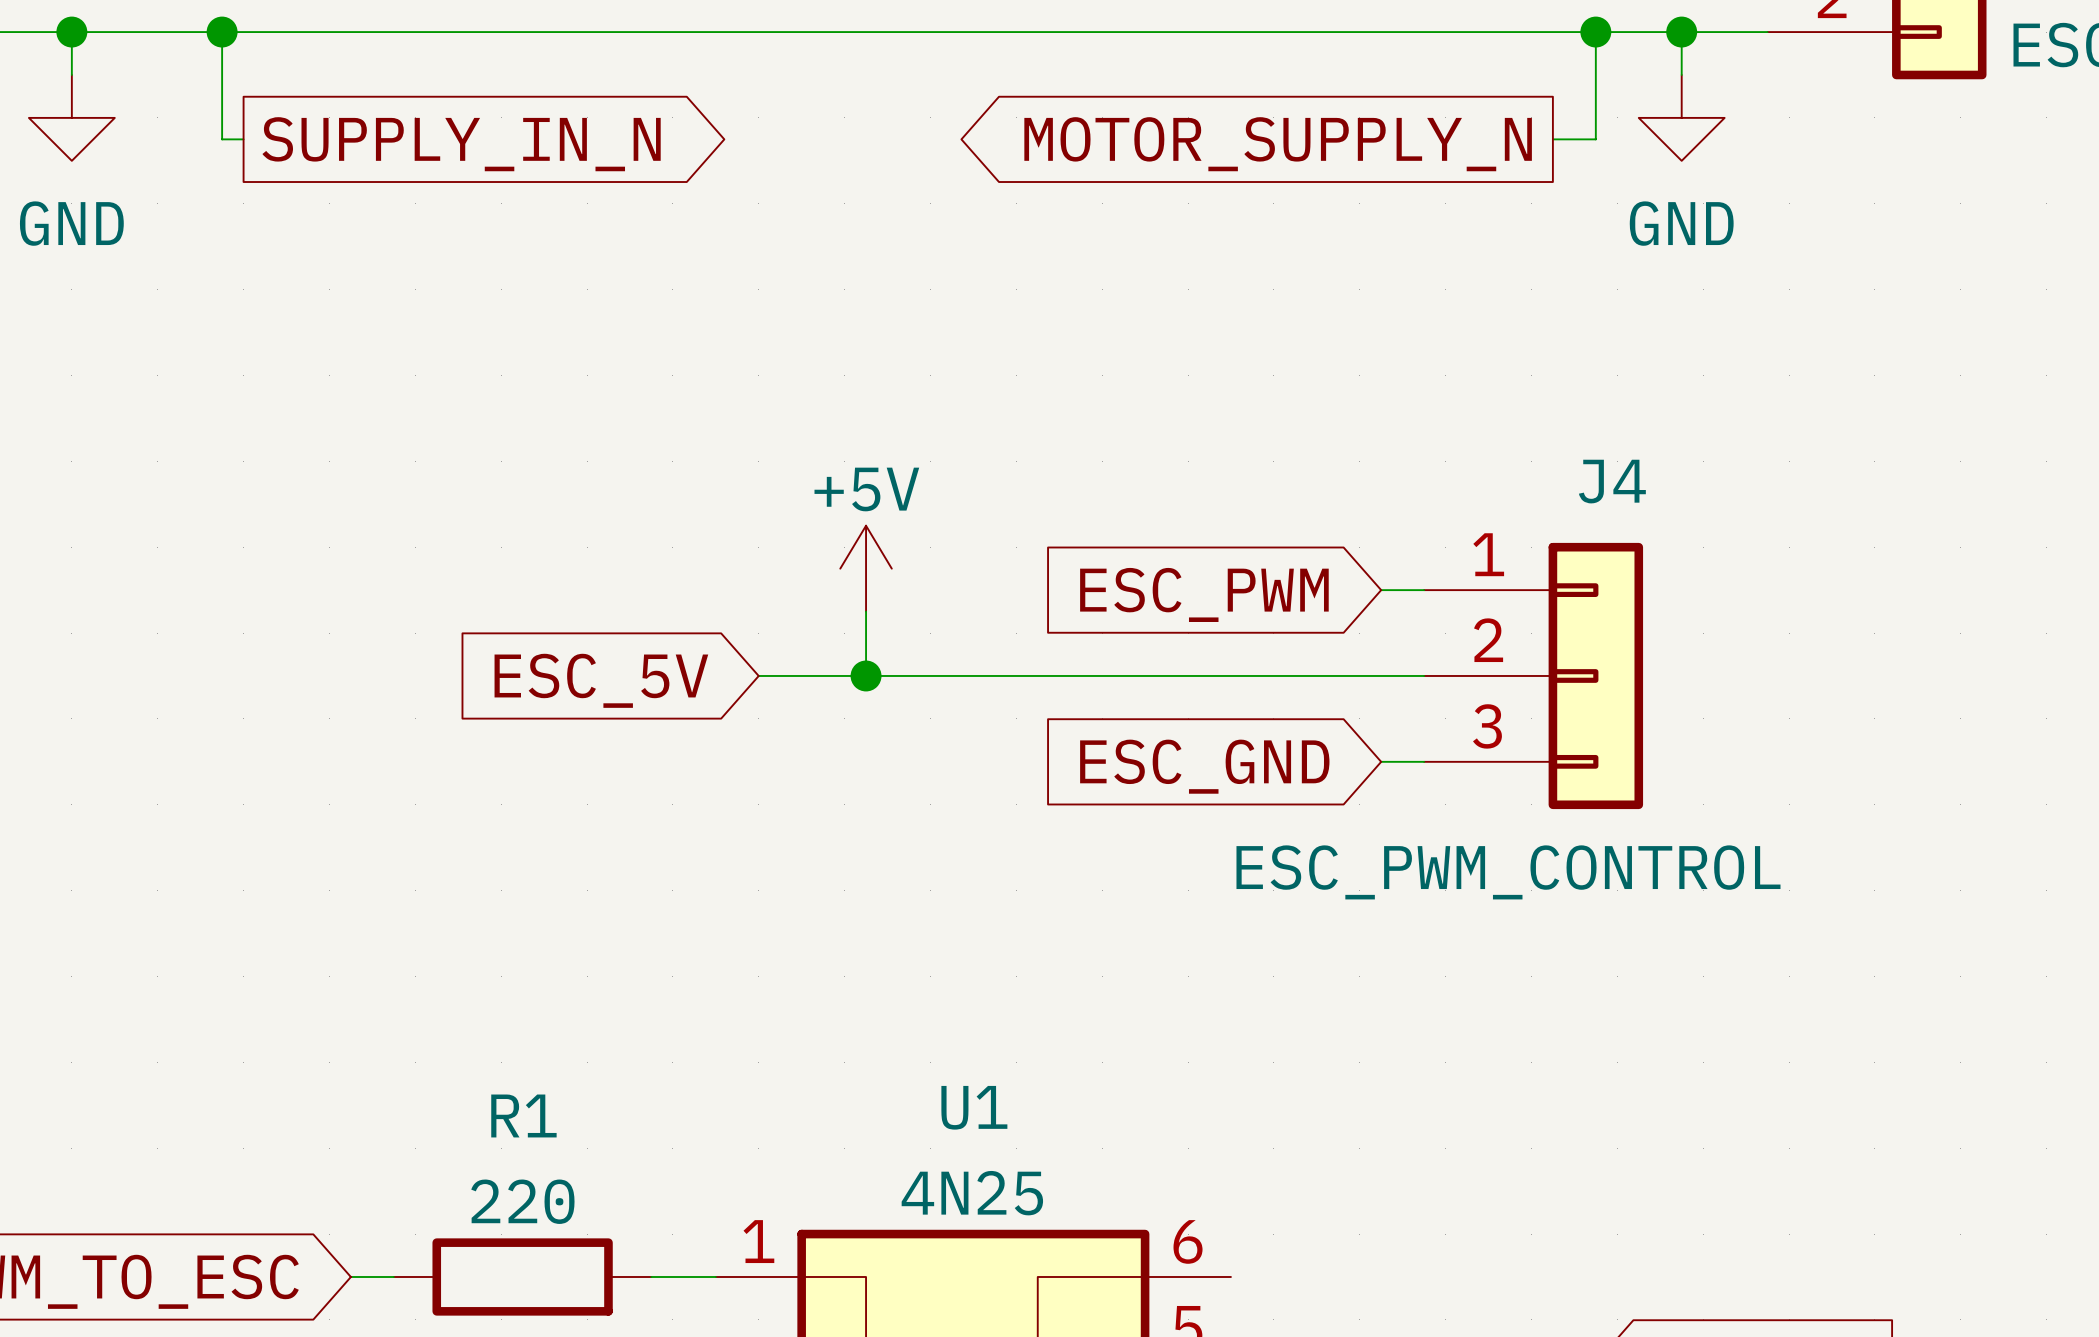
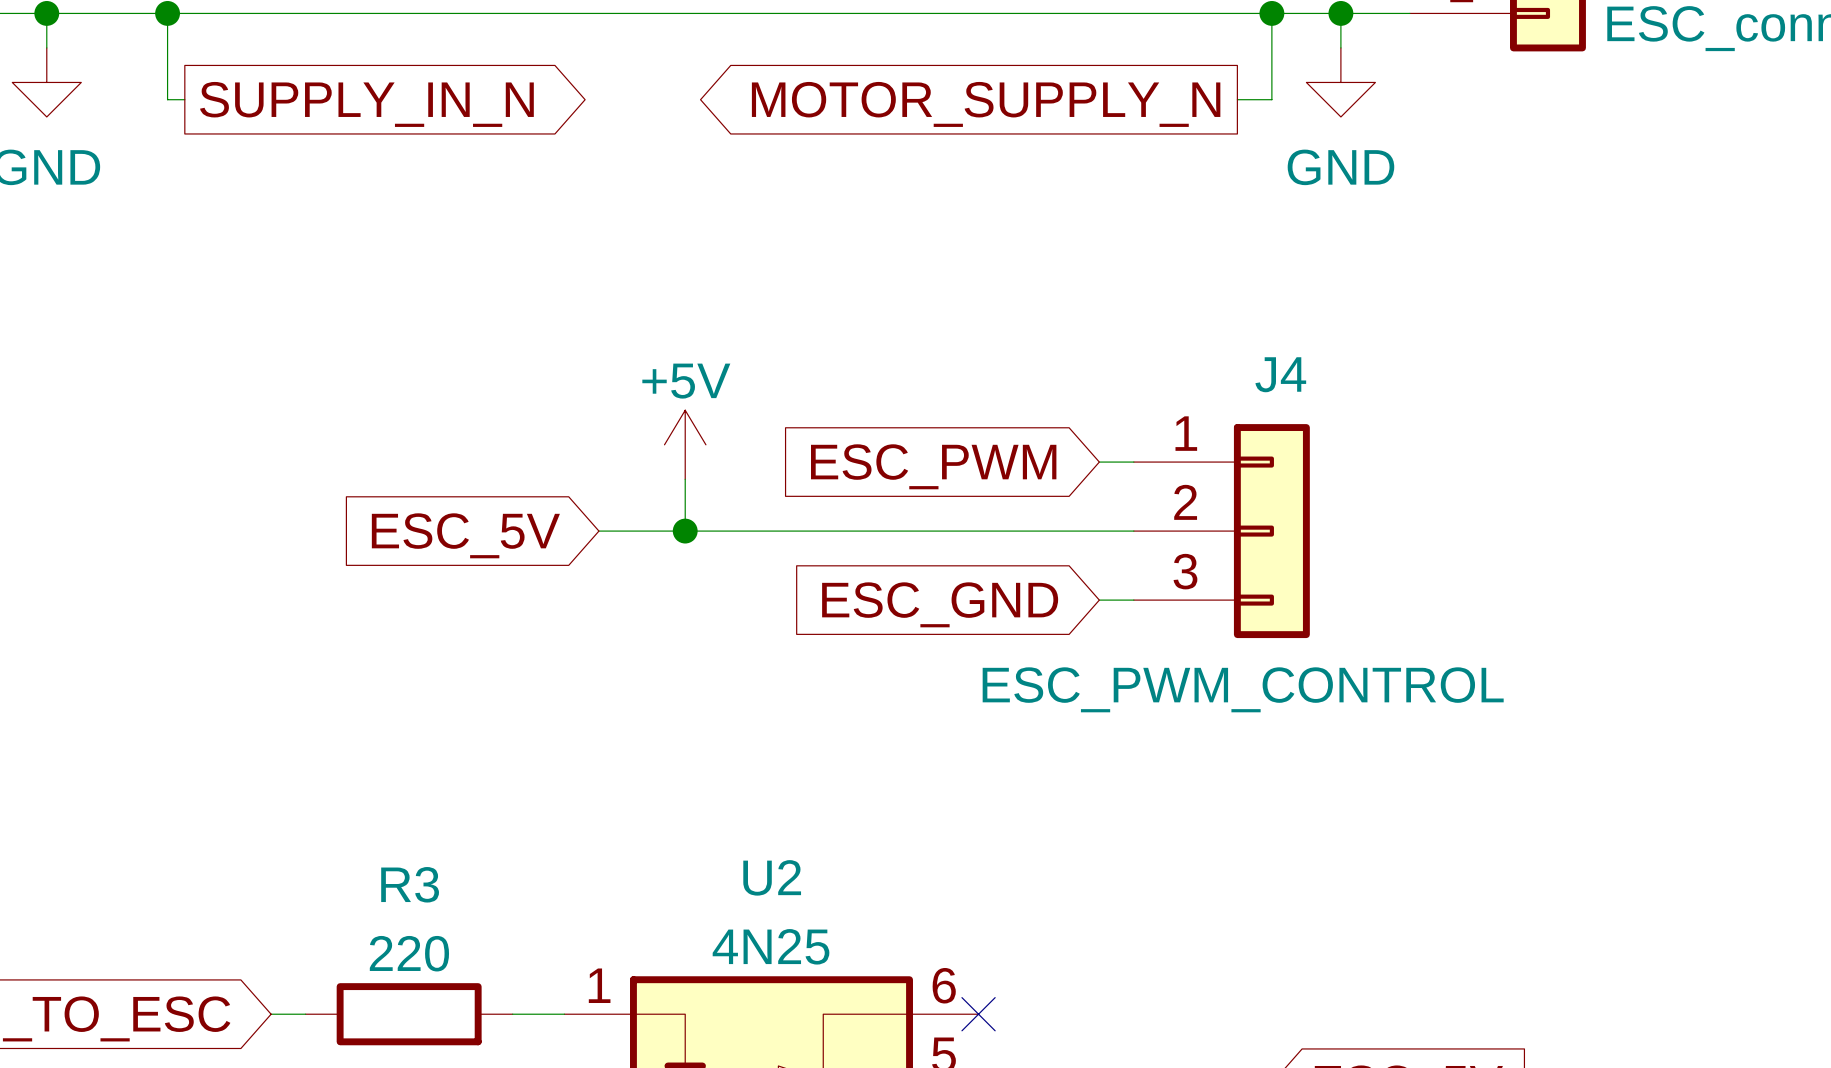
U1 name: U1 (974, 1107) -> U2 (772, 877)
R1 name: R1 (523, 1115) -> R3 (410, 884)
no-connect mark: none -> (978, 1014)

